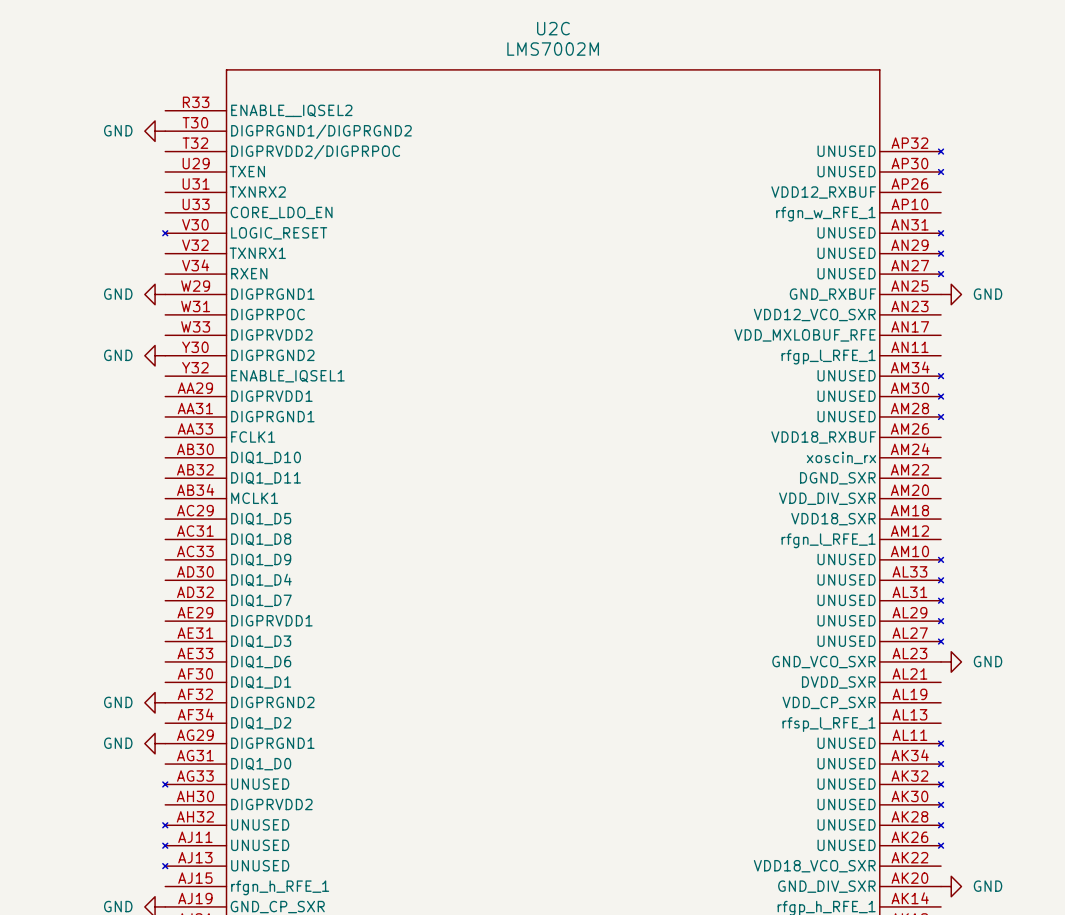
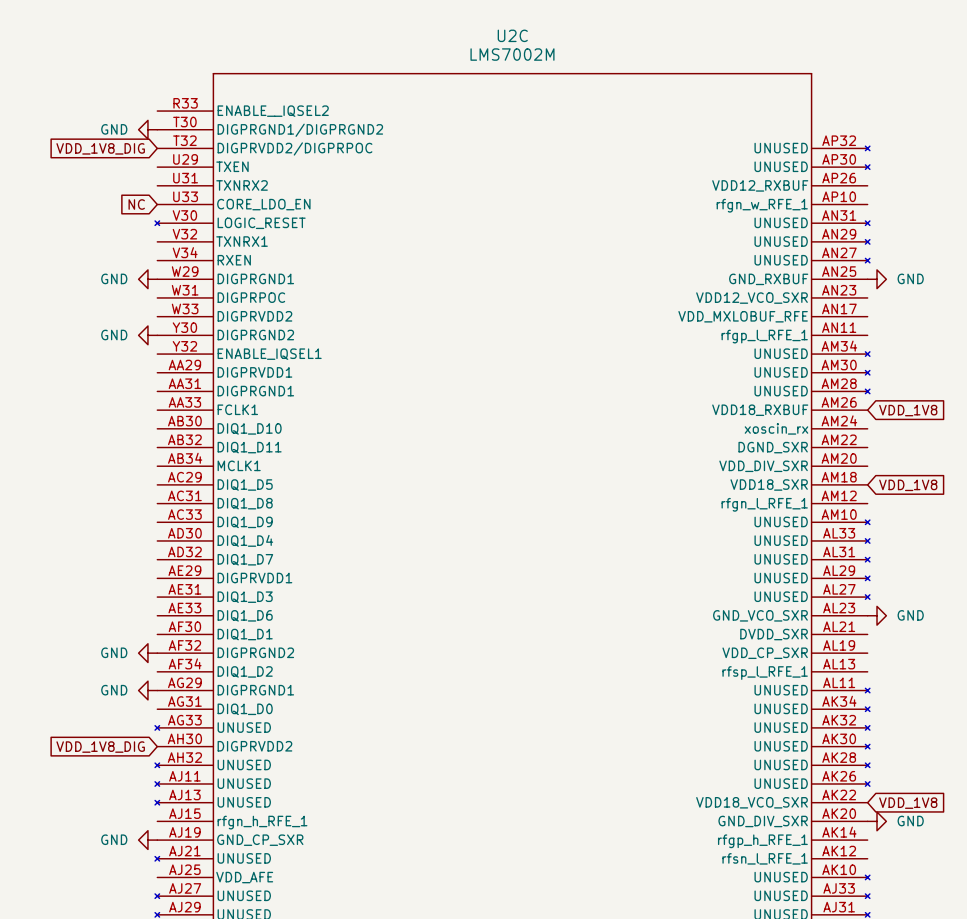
global label: none -> VDD_1V8_DIG (100, 148)
global label: none -> NC (136, 204)
global label: none -> VDD_1V8 (908, 410)
global label: none -> VDD_1V8 (908, 485)
global label: none -> VDD_1V8_DIG (100, 747)
global label: none -> VDD_1V8 (908, 803)

